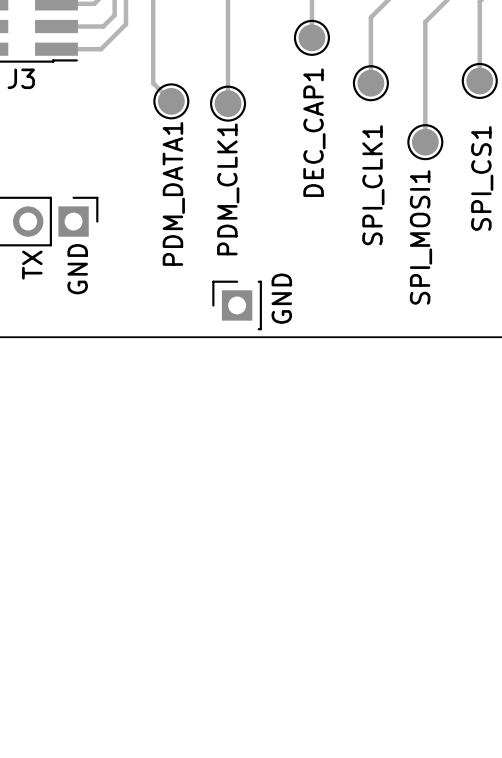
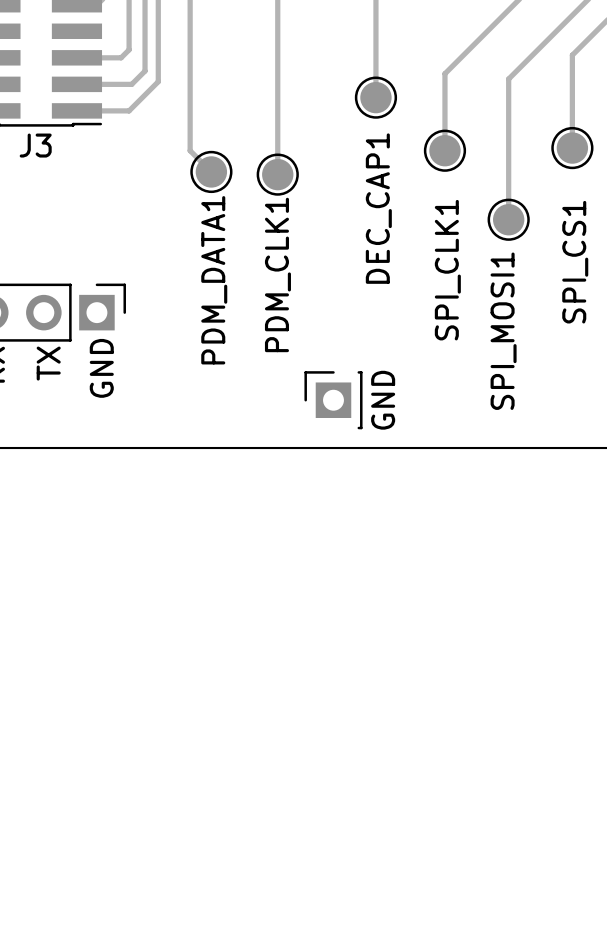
part: none -> (333, 400)
text: none -> GND (383, 400)
GND: (237, 305) -> none

